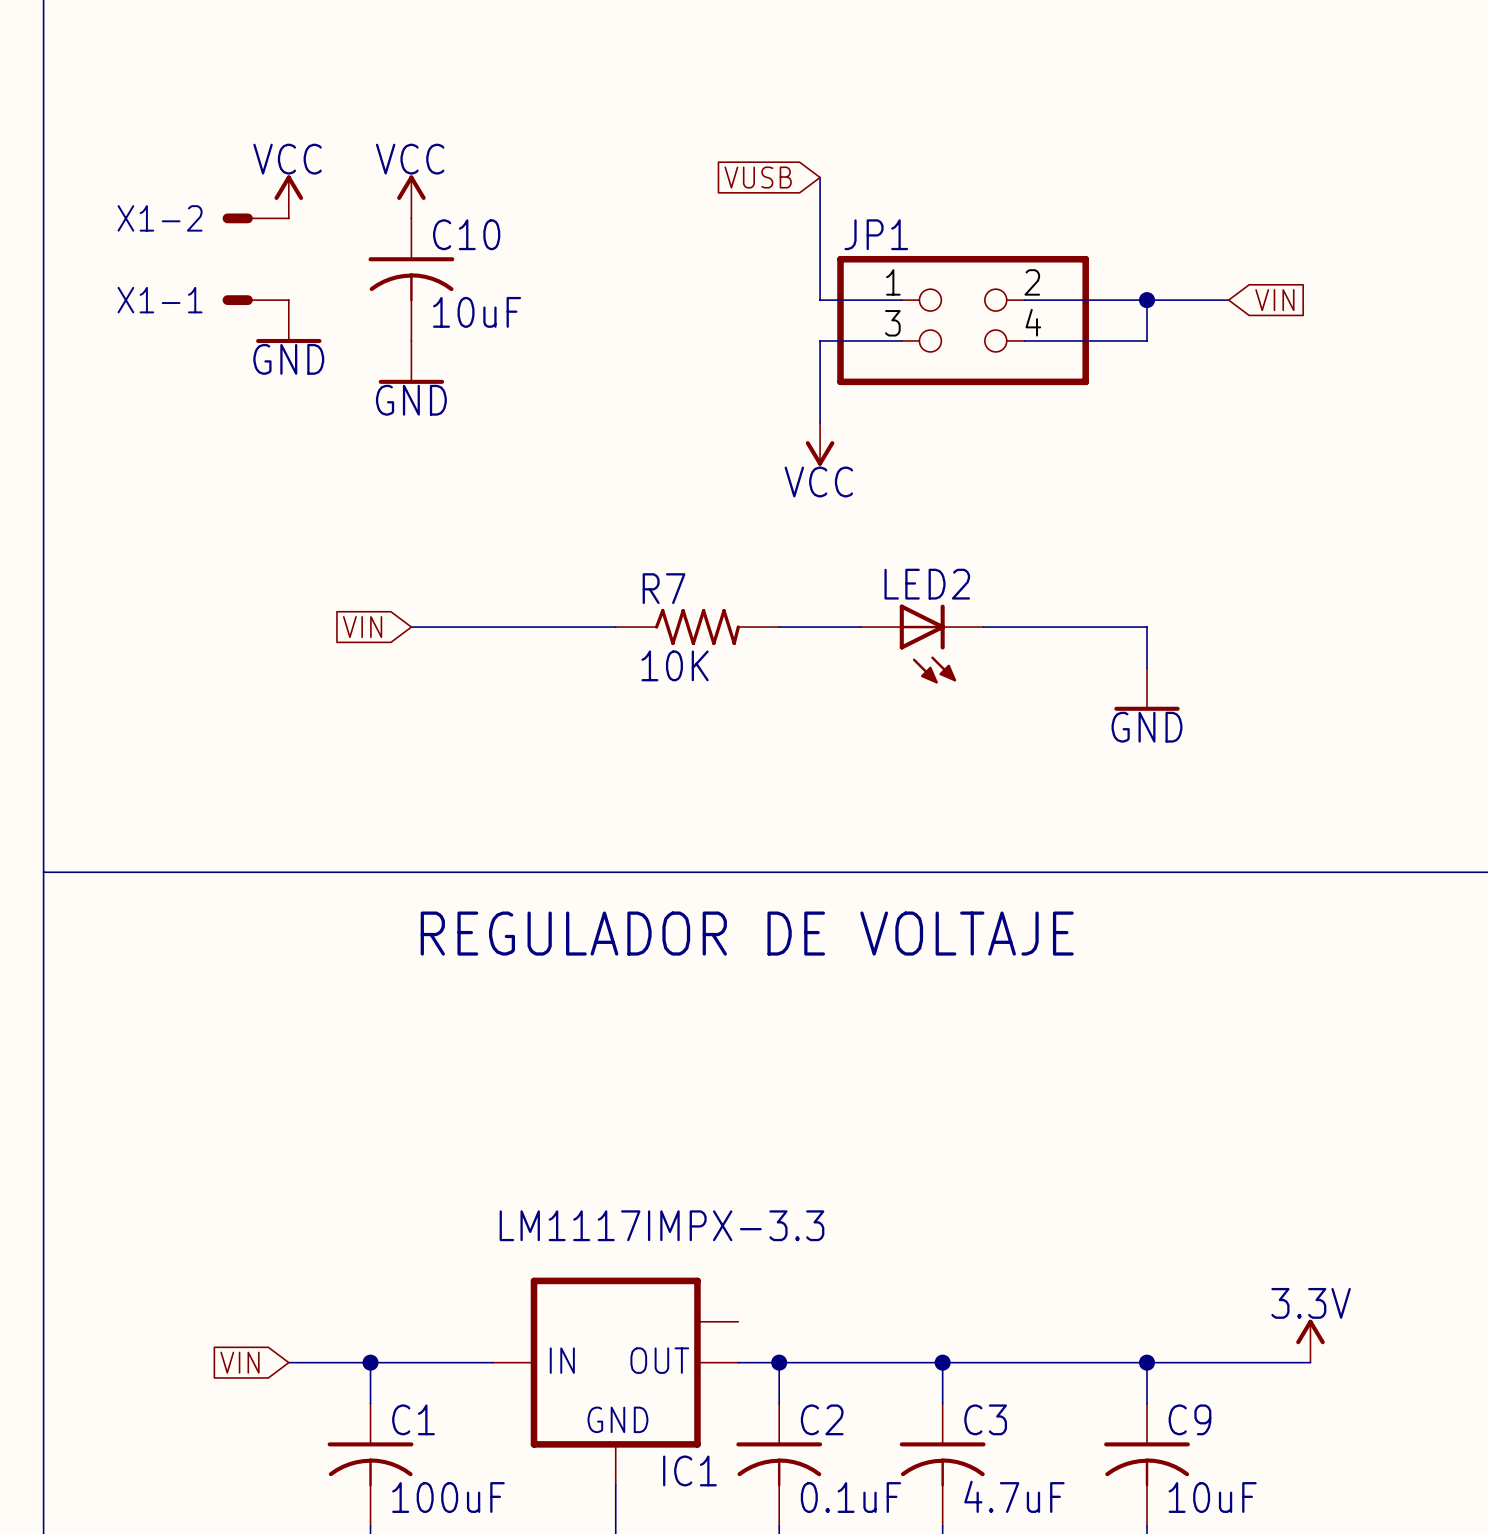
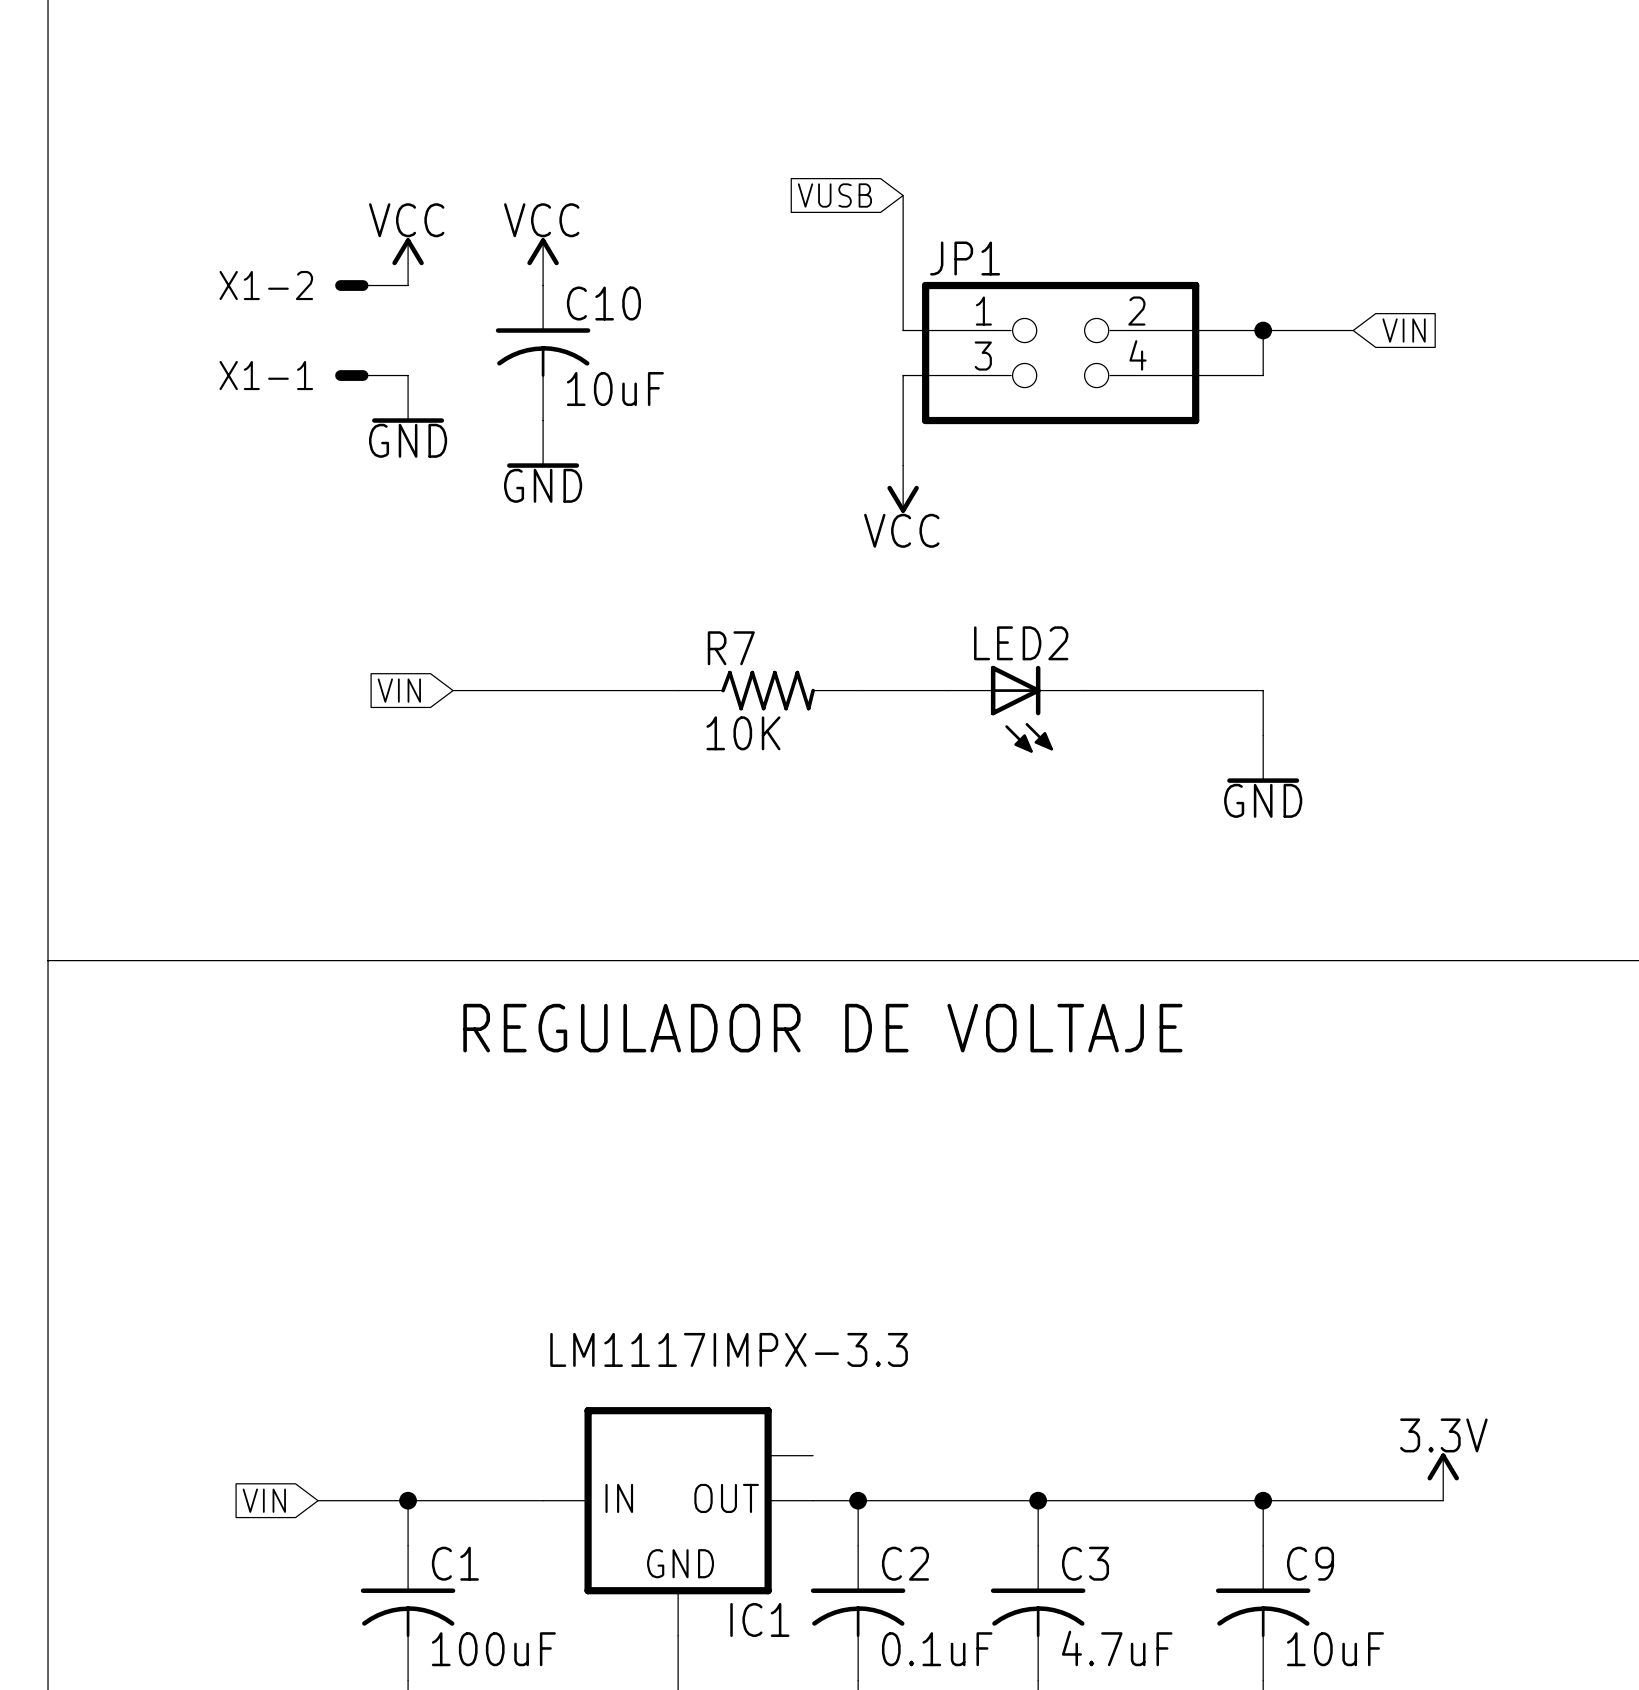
power symbol: VCC (288, 196) -> none
power symbol: VCC (411, 196) -> none
X1-2 position: (255, 218) -> (371, 285)
power symbol: none -> VCC (408, 261)
power symbol: none -> VCC (543, 261)
C10 position: (411, 279) -> (543, 353)
X1-1 position: (255, 300) -> (371, 375)
power symbol: GND (288, 321) -> none
power symbol position: GND (411, 362) -> GND (408, 399)
power symbol: none -> GND (543, 444)

